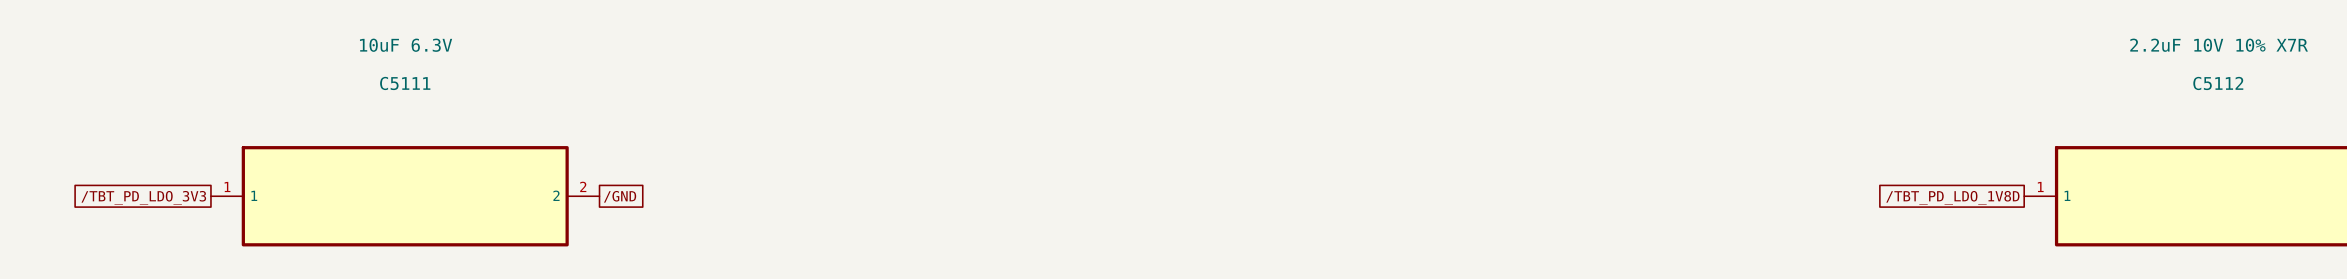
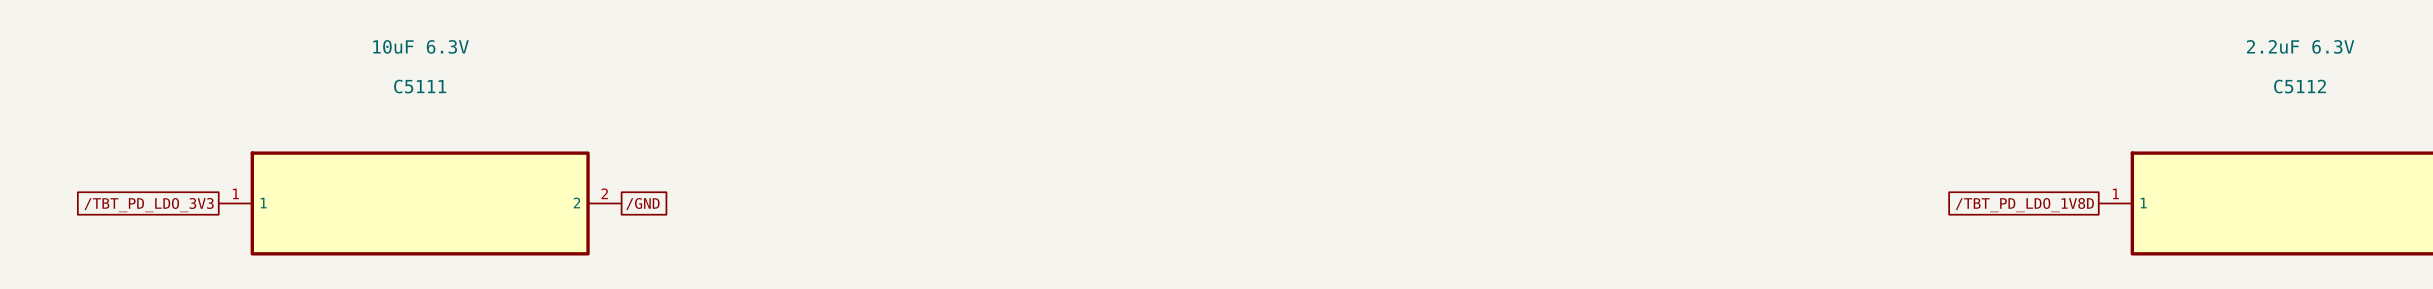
C5112 value: 2.2uF 10V 10% X7R (2219, 45) -> 2.2uF 6.3V (2300, 46)

